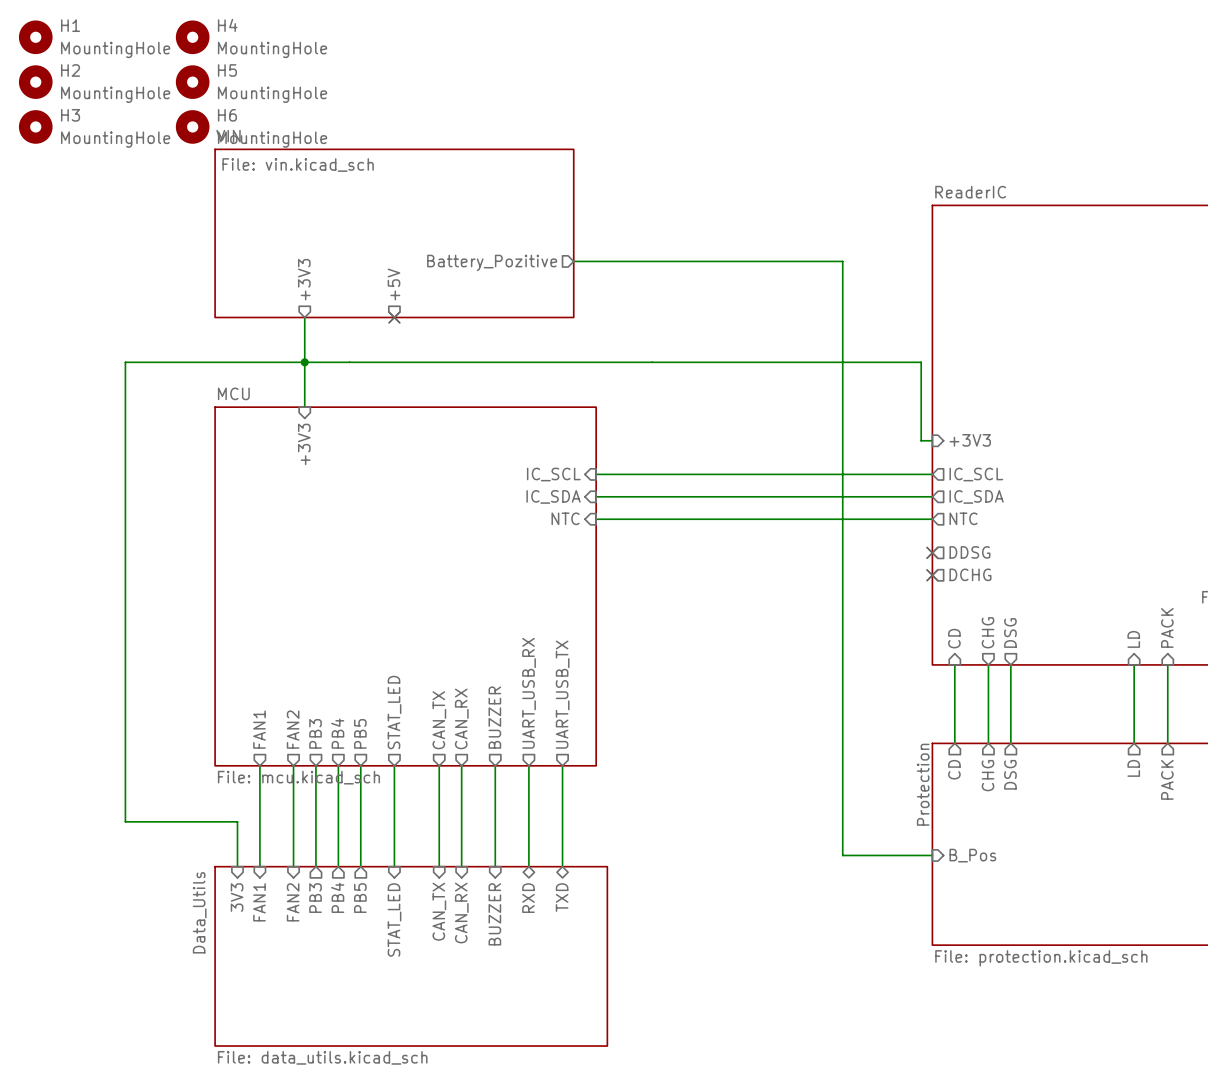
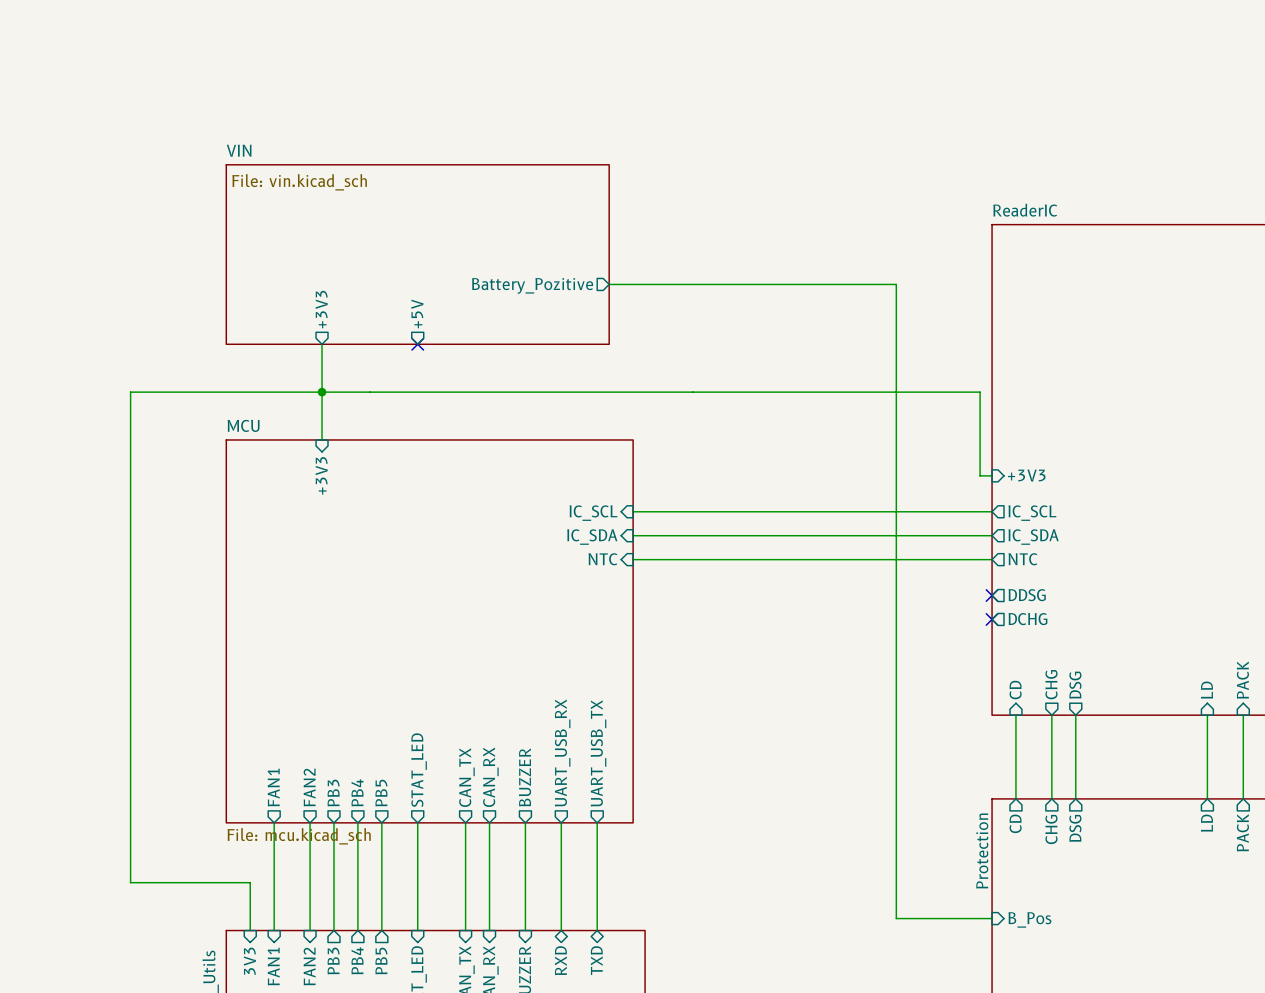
H1: MountingHole (35, 37) -> none
H4: MountingHole (192, 37) -> none
H2: MountingHole (35, 82) -> none
H5: MountingHole (192, 82) -> none
H3: MountingHole (35, 126) -> none
H6: MountingHole (192, 126) -> none

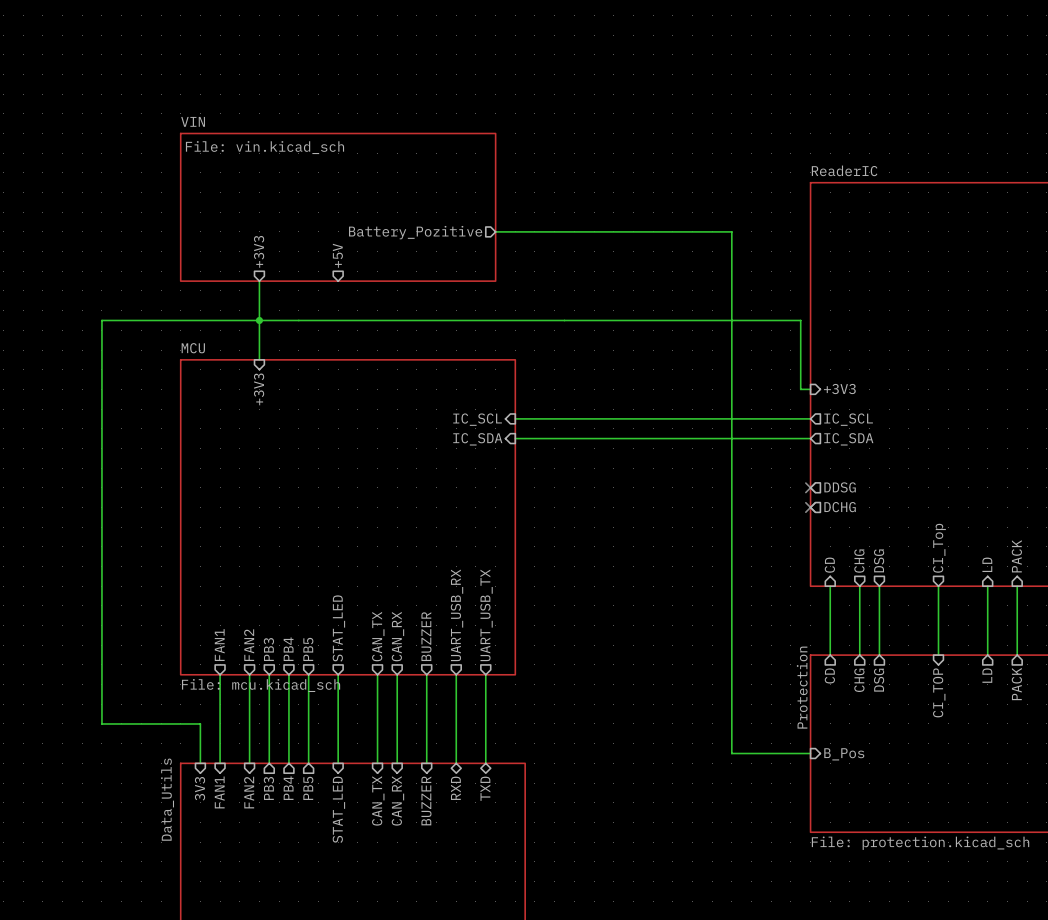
no-connect mark: (417, 344) -> none
sheet pin: NTC (602, 559) -> none
wire: (633, 559) (992, 559) -> none
sheet pin: NTC (1022, 559) -> none
sheet pin: none -> CI_Top (939, 548)
wire: none -> (938, 586) (938, 655)
sheet pin: none -> CI_TOP (939, 692)

